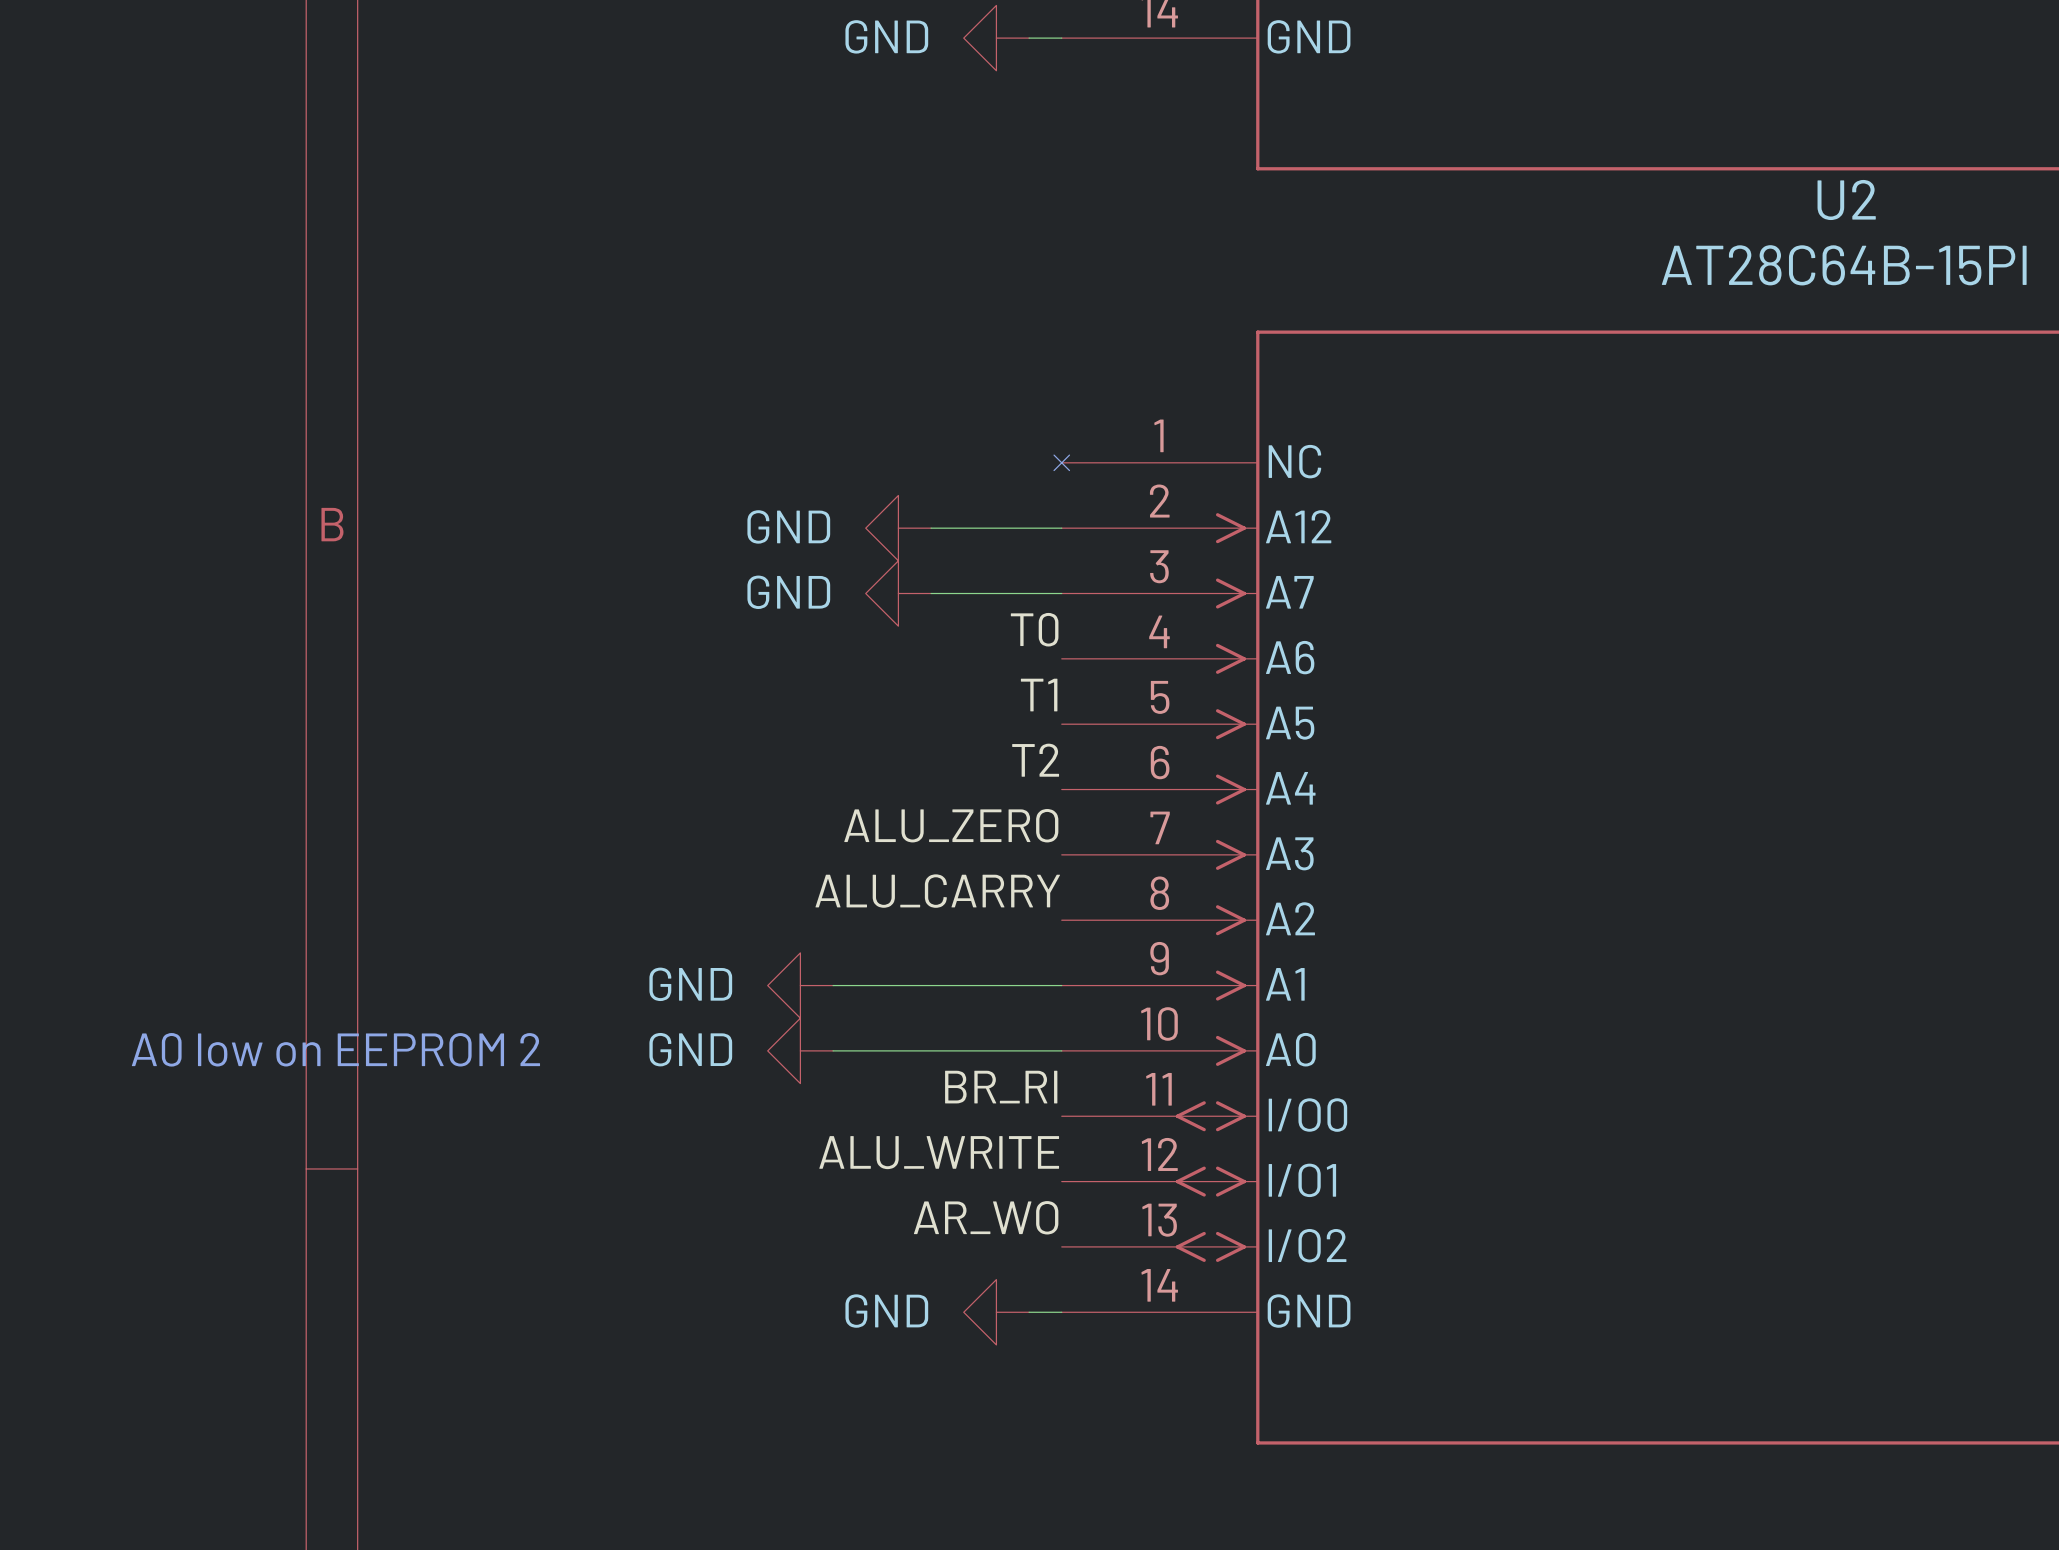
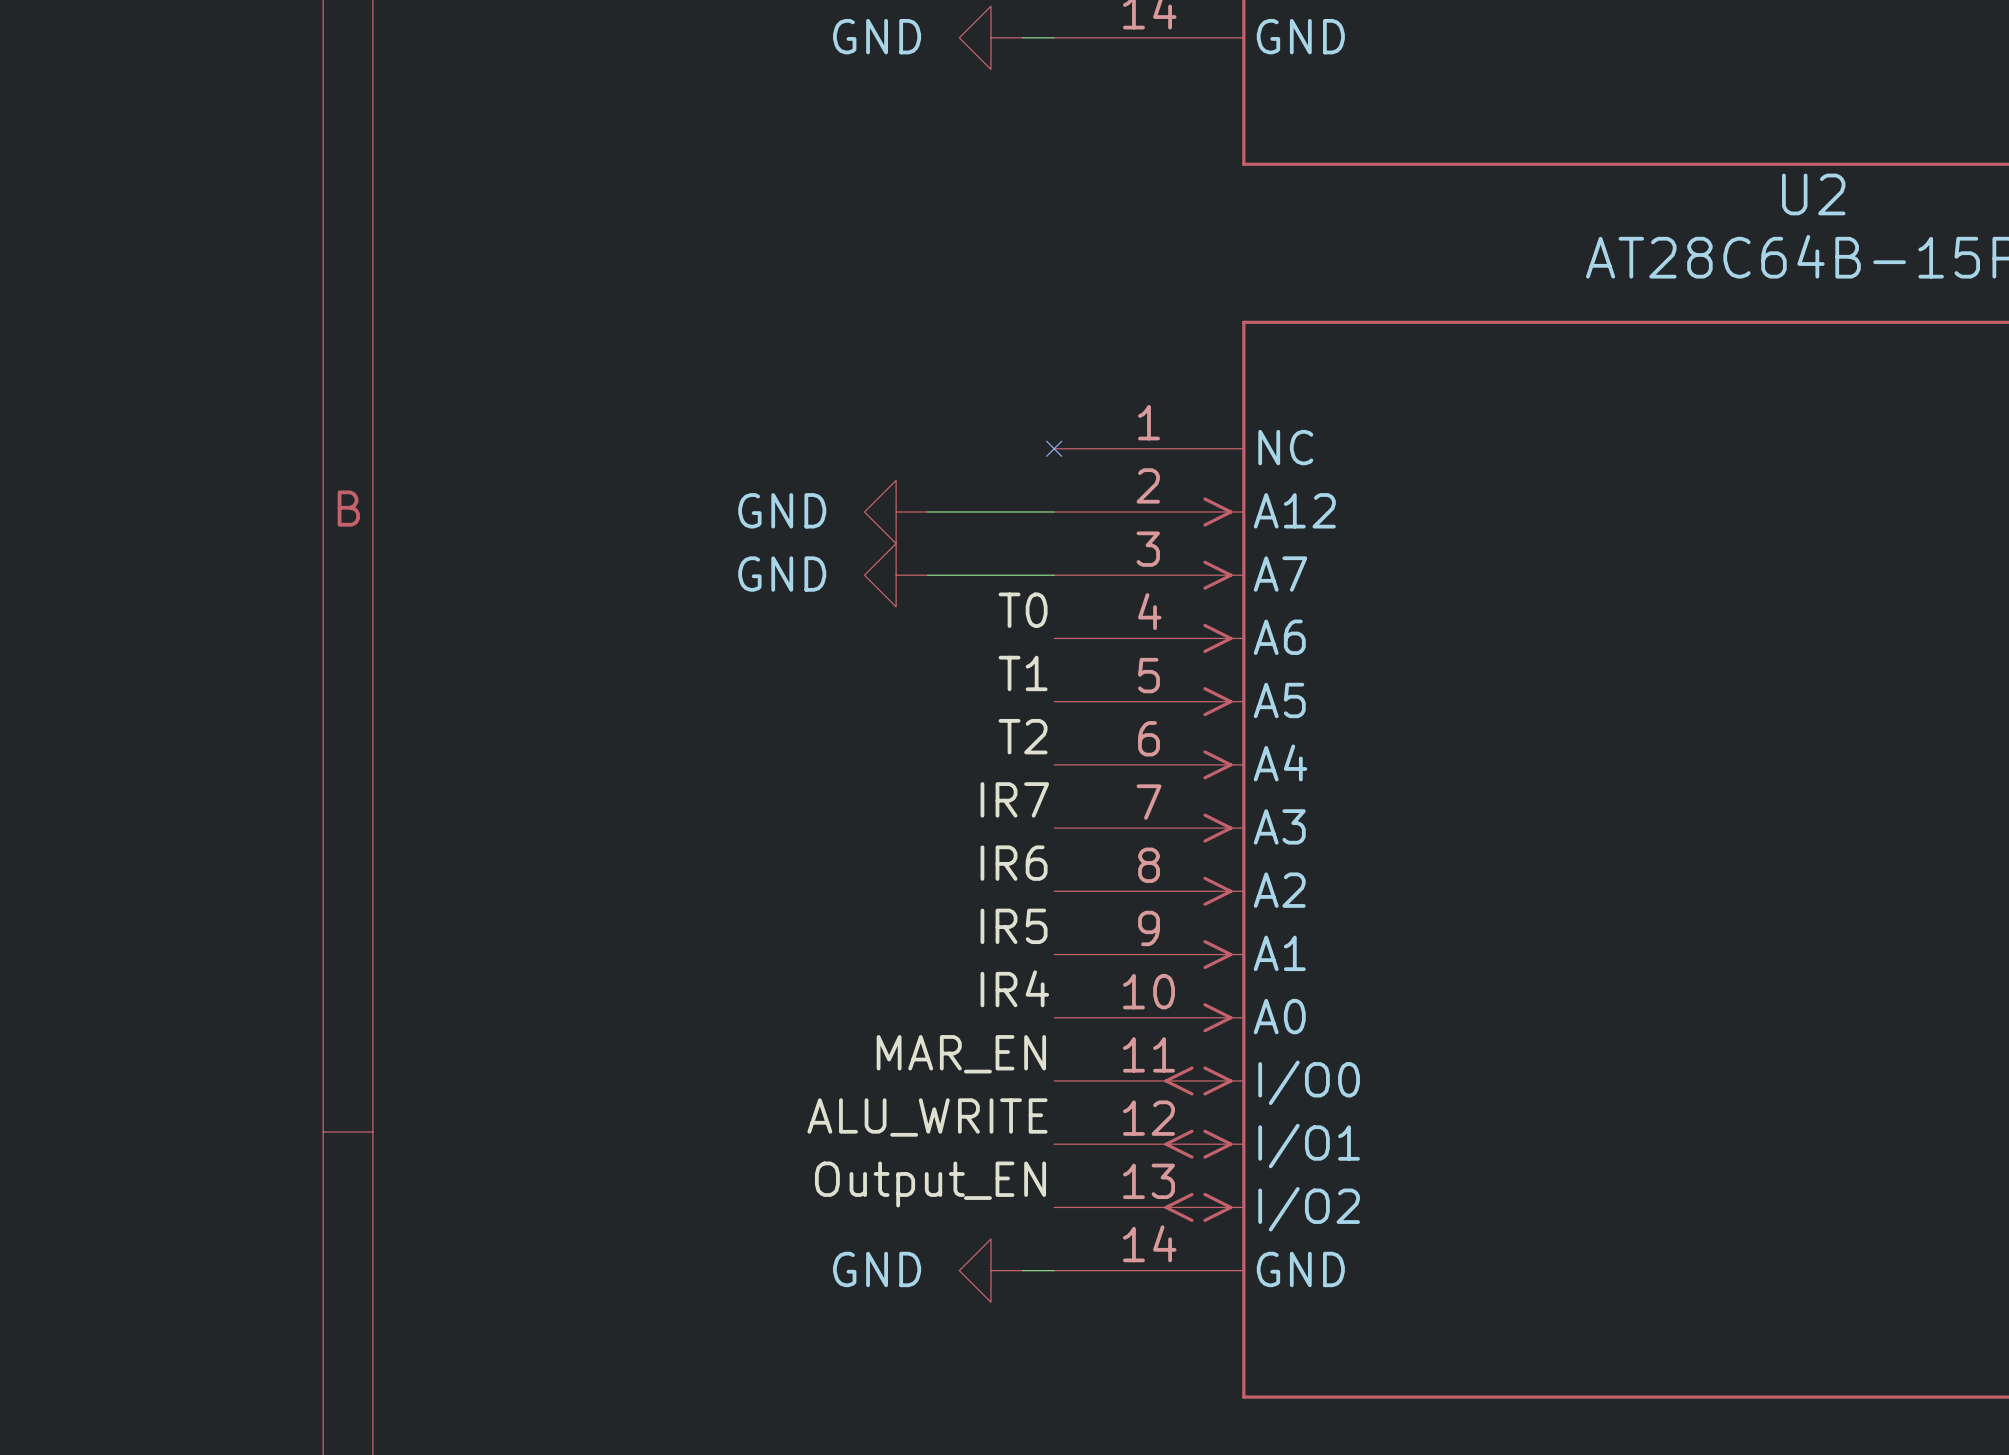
label: ALU_ZERO (951, 825) -> IR7 (1014, 799)
label: ALU_CARRY (937, 891) -> IR6 (1014, 863)
label: none -> IR5 (1014, 926)
power symbol: GND (800, 985) -> none
wire: (833, 985) (1061, 985) -> none
label: none -> IR4 (1014, 988)
text: A0 low on EEPROM 2 (335, 1049) -> none
power symbol: GND (800, 1050) -> none
wire: (833, 1050) (1061, 1050) -> none
label: BR_RI (1001, 1087) -> MAR_EN (961, 1054)
label: AR_WO (986, 1217) -> Output_EN (930, 1184)

